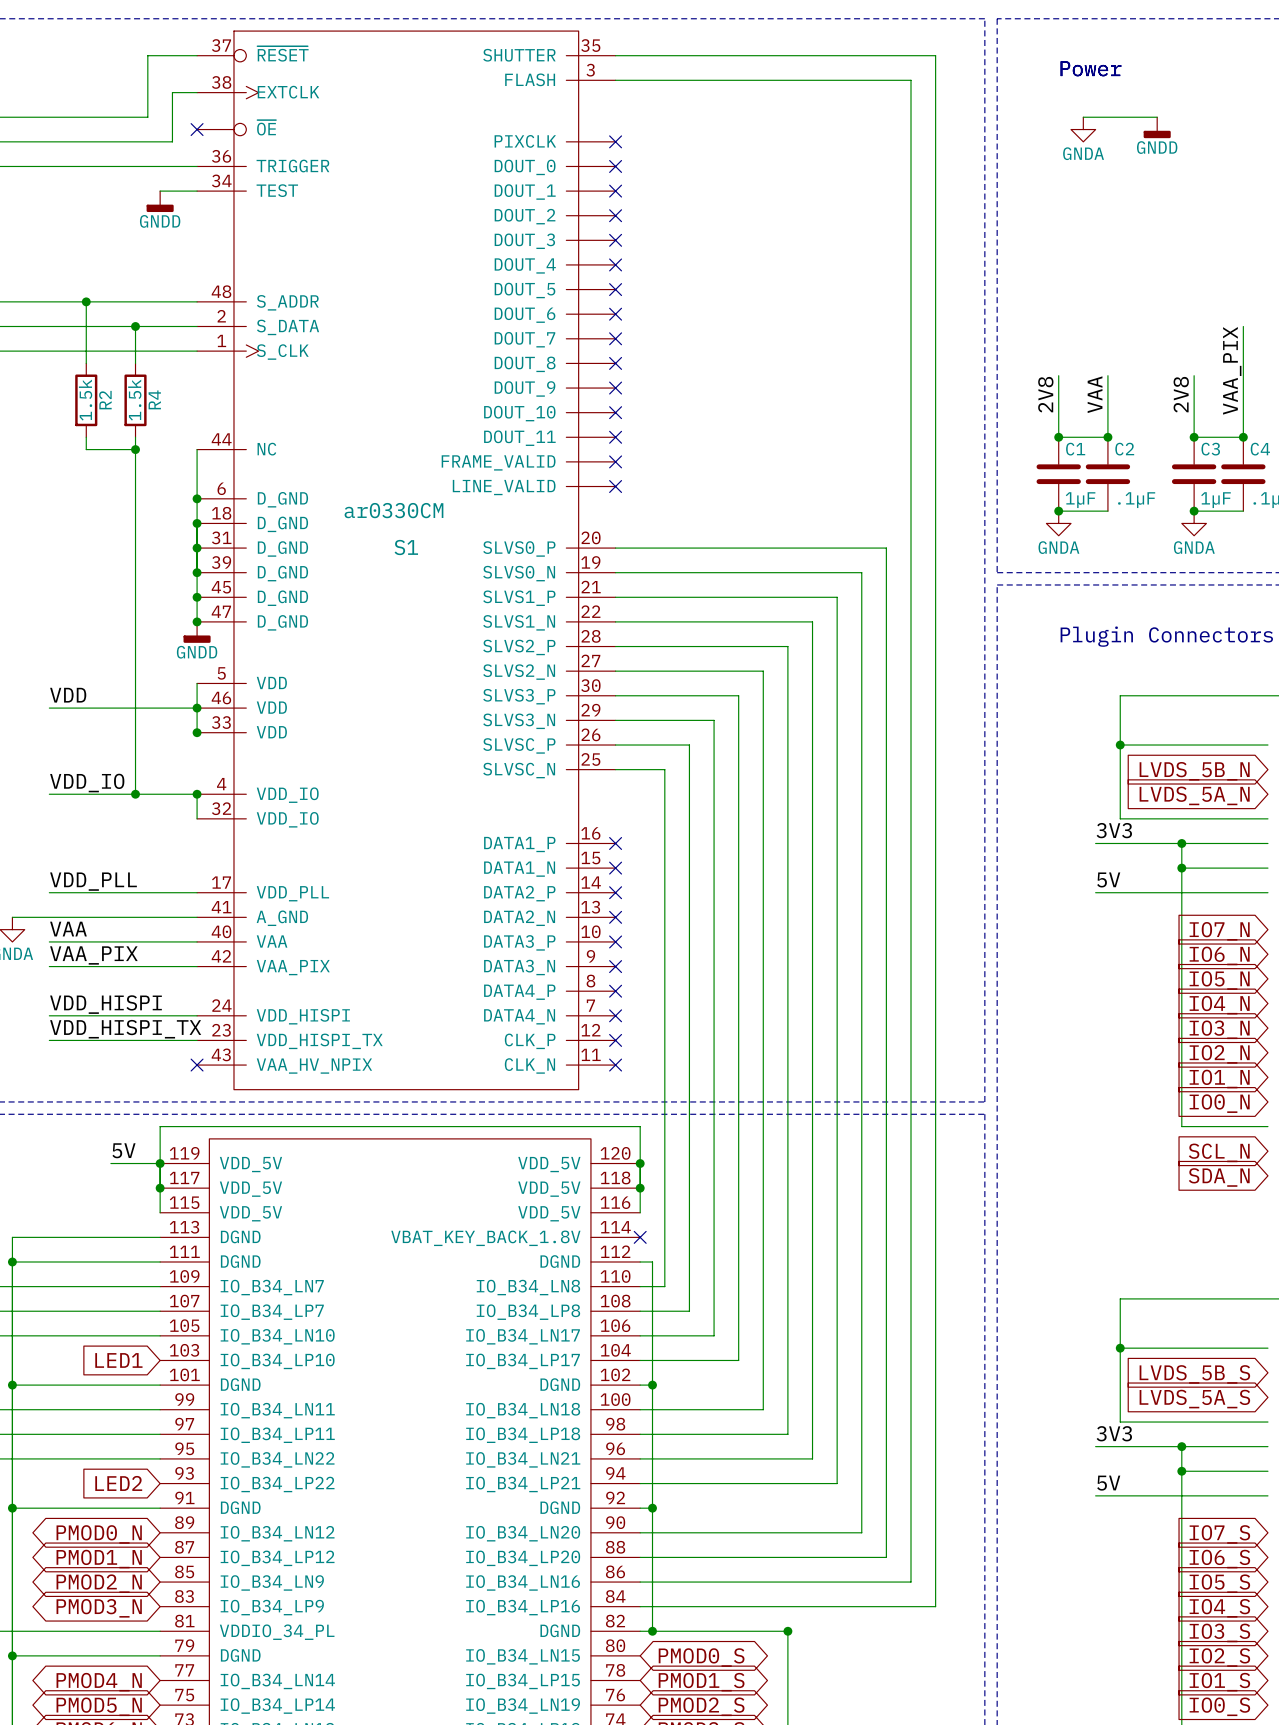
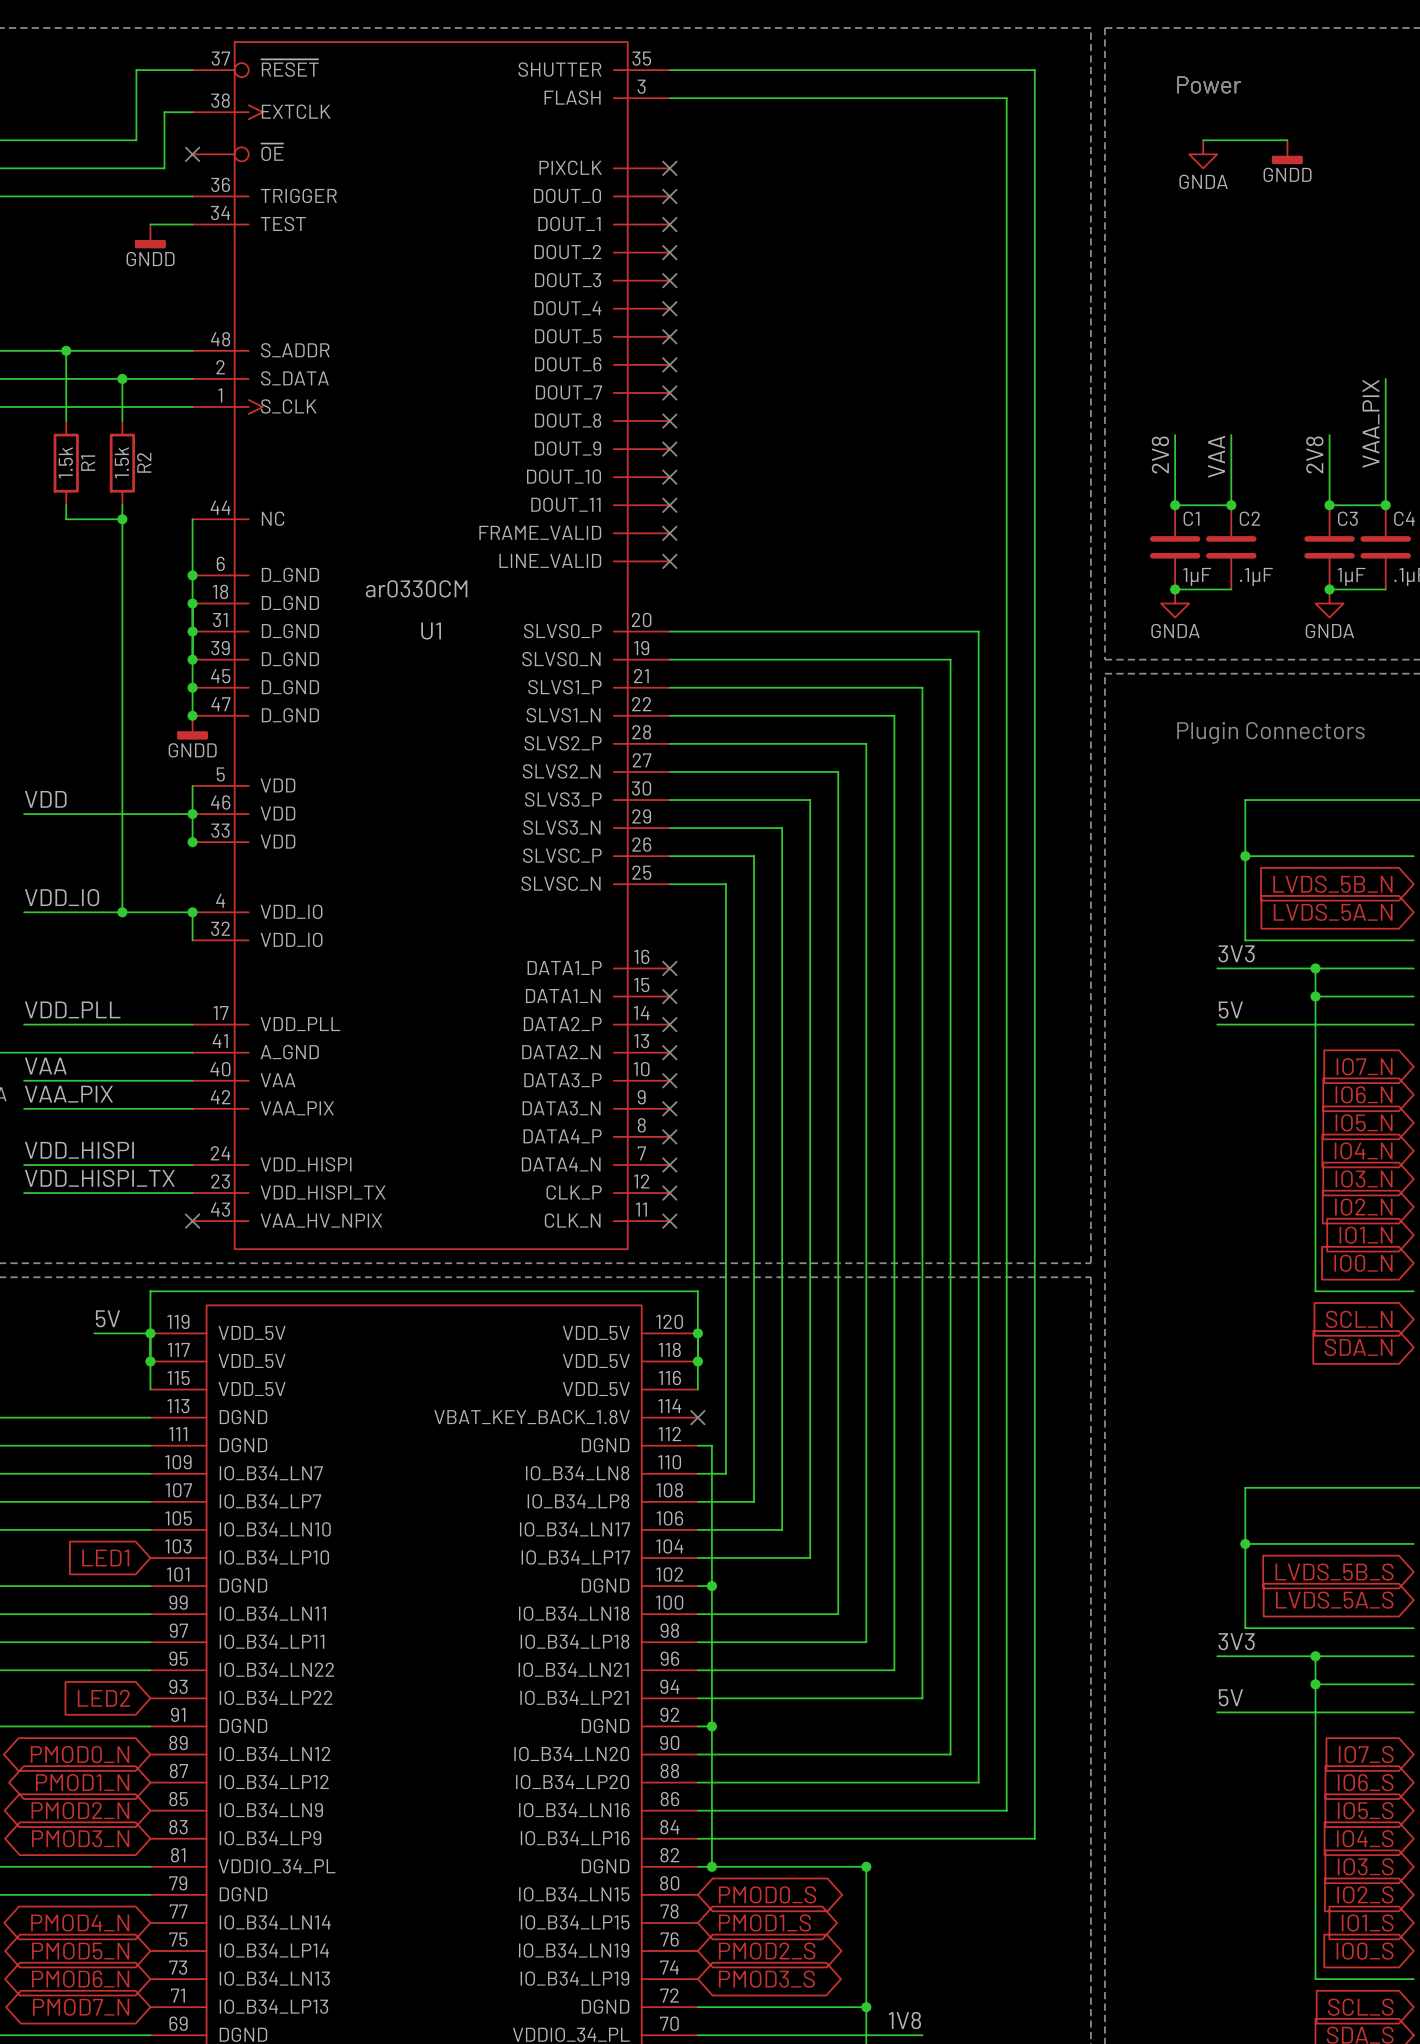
R4 name: R4 (154, 399) -> R2 (144, 462)
R2 name: R2 (105, 400) -> R1 (88, 463)
S1 name: S1 (406, 547) -> U1 (431, 631)

